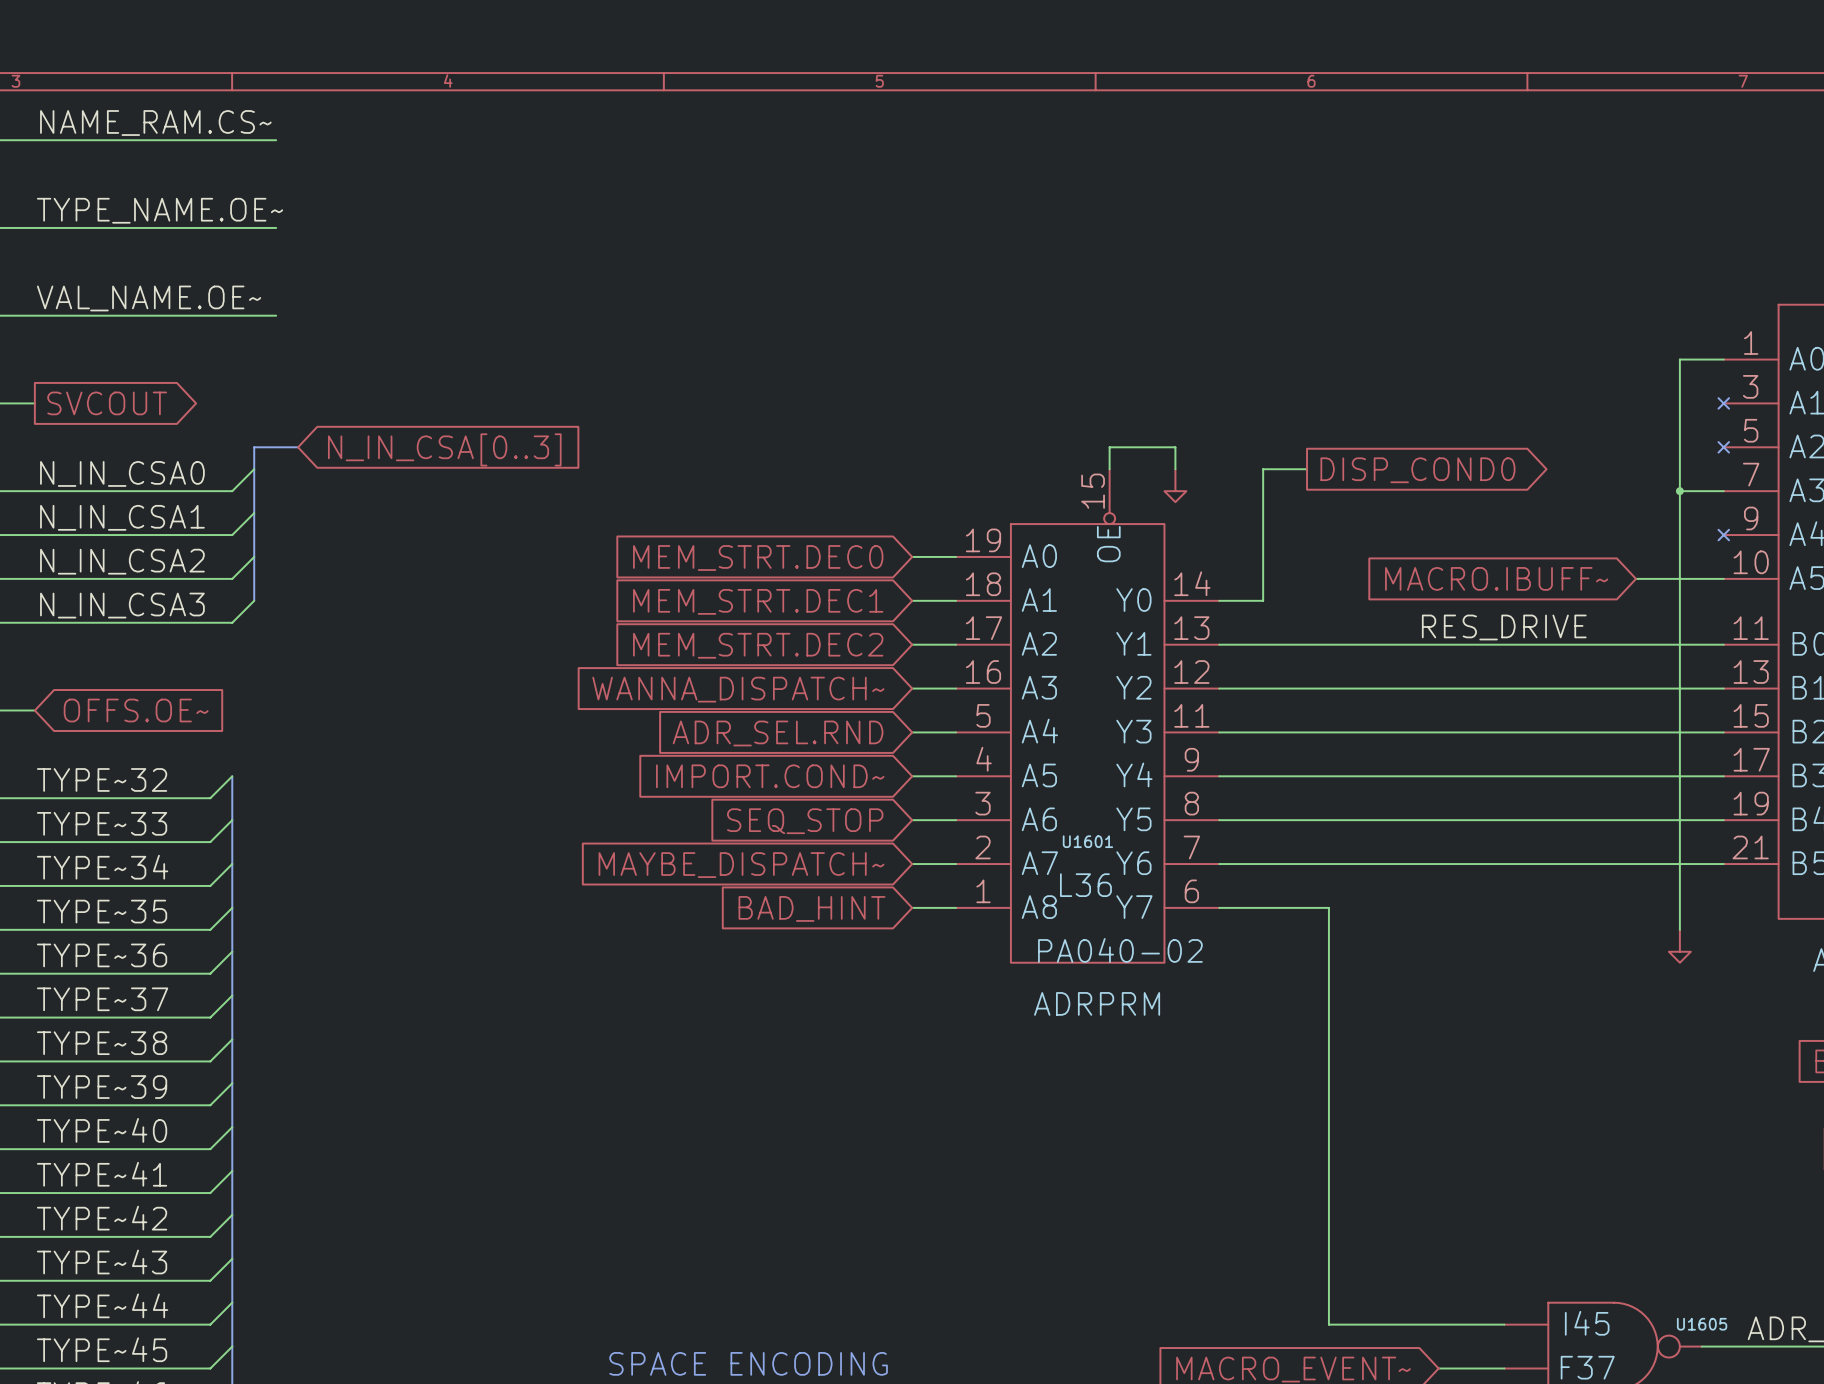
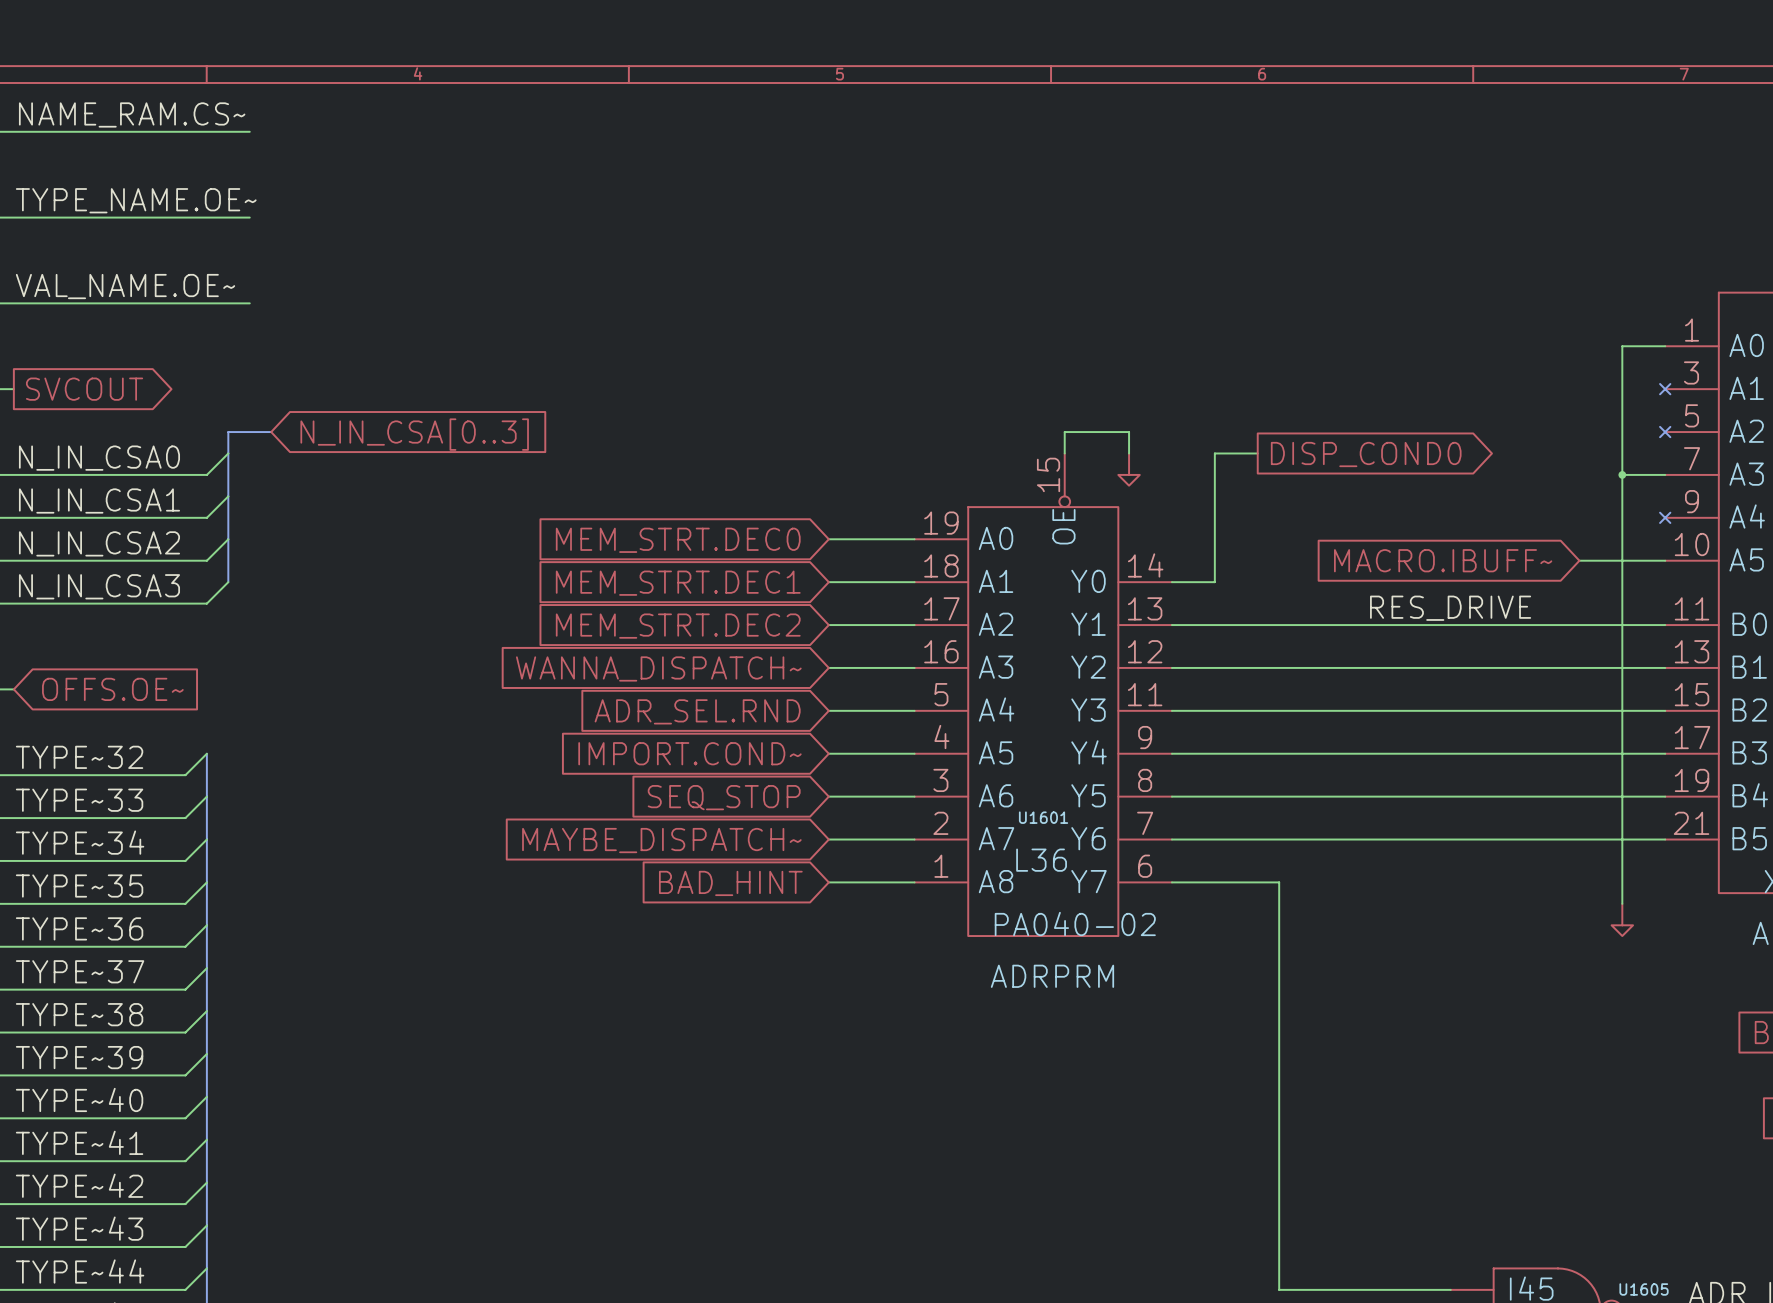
wire: none -> (828, 539) (871, 539)
global label position: MEM_STRT.DEC0 (758, 558) -> MEM_STRT.DEC0 (678, 540)
wire: none -> (828, 582) (871, 582)
global label position: MEM_STRT.DEC1 (758, 601) -> MEM_STRT.DEC1 (678, 583)
wire: none -> (828, 625) (871, 625)
global label position: MEM_STRT.DEC2 (758, 645) -> MEM_STRT.DEC2 (678, 626)
wire: none -> (828, 667) (871, 667)
global label position: WANNA_DISPATCH~ (738, 689) -> WANNA_DISPATCH~ (658, 668)
wire: none -> (828, 710) (871, 710)
global label position: ADR_SEL.RND (778, 733) -> ADR_SEL.RND (697, 711)
global label position: IMPORT.COND~ (770, 776) -> IMPORT.COND~ (689, 753)
wire: none -> (828, 753) (871, 753)
wire: none -> (828, 796) (871, 796)
global label position: SEQ_STOP (805, 821) -> SEQ_STOP (724, 797)
wire: none -> (828, 839) (871, 839)
global label position: MAYBE_DISPATCH~ (741, 865) -> MAYBE_DISPATCH~ (661, 840)
wire: none -> (828, 882) (871, 882)
global label position: BAD_HINT (812, 908) -> BAD_HINT (730, 883)

